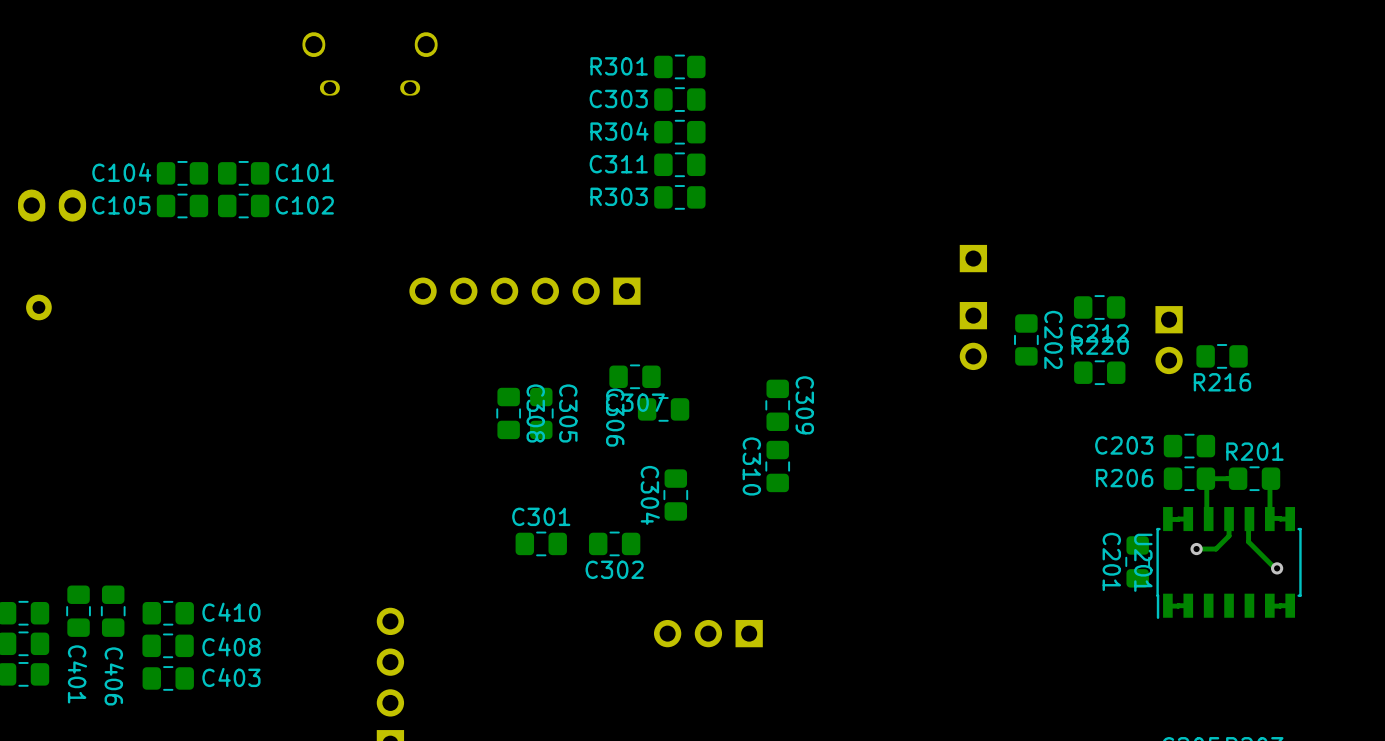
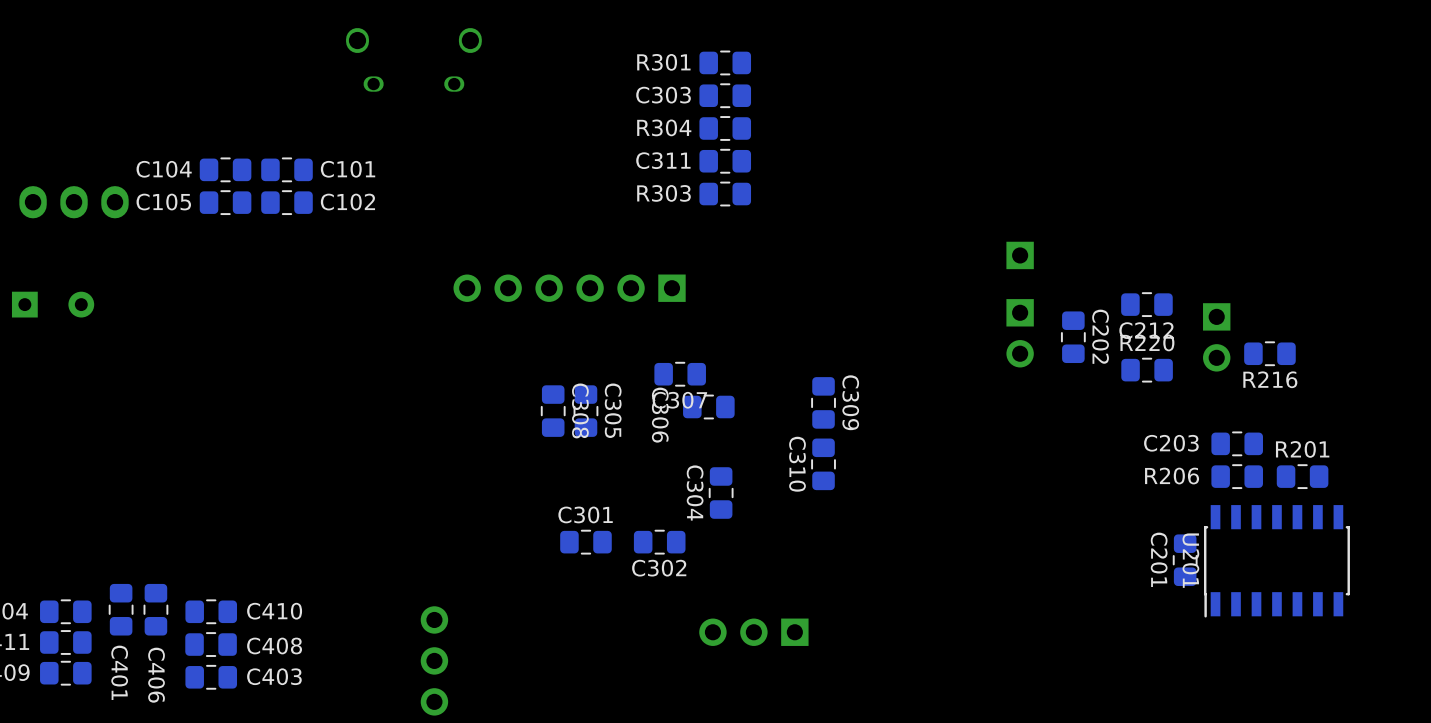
track: (1238, 478) (1206, 478) (1206, 516) (1208, 518) -> none
track: (1272, 478) (1269, 480) (1269, 518) (1290, 519) -> none
track: (1188, 519) (1168, 519) -> none
track: (1229, 519) (1229, 535) (1216, 549) (1196, 549) -> none
track: (1249, 519) (1248, 541) (1277, 568) -> none
via: (1196, 549) -> none
via: (1277, 568) -> none
track: (1188, 605) (1168, 606) -> none
track: (1290, 605) (1269, 606) -> none

